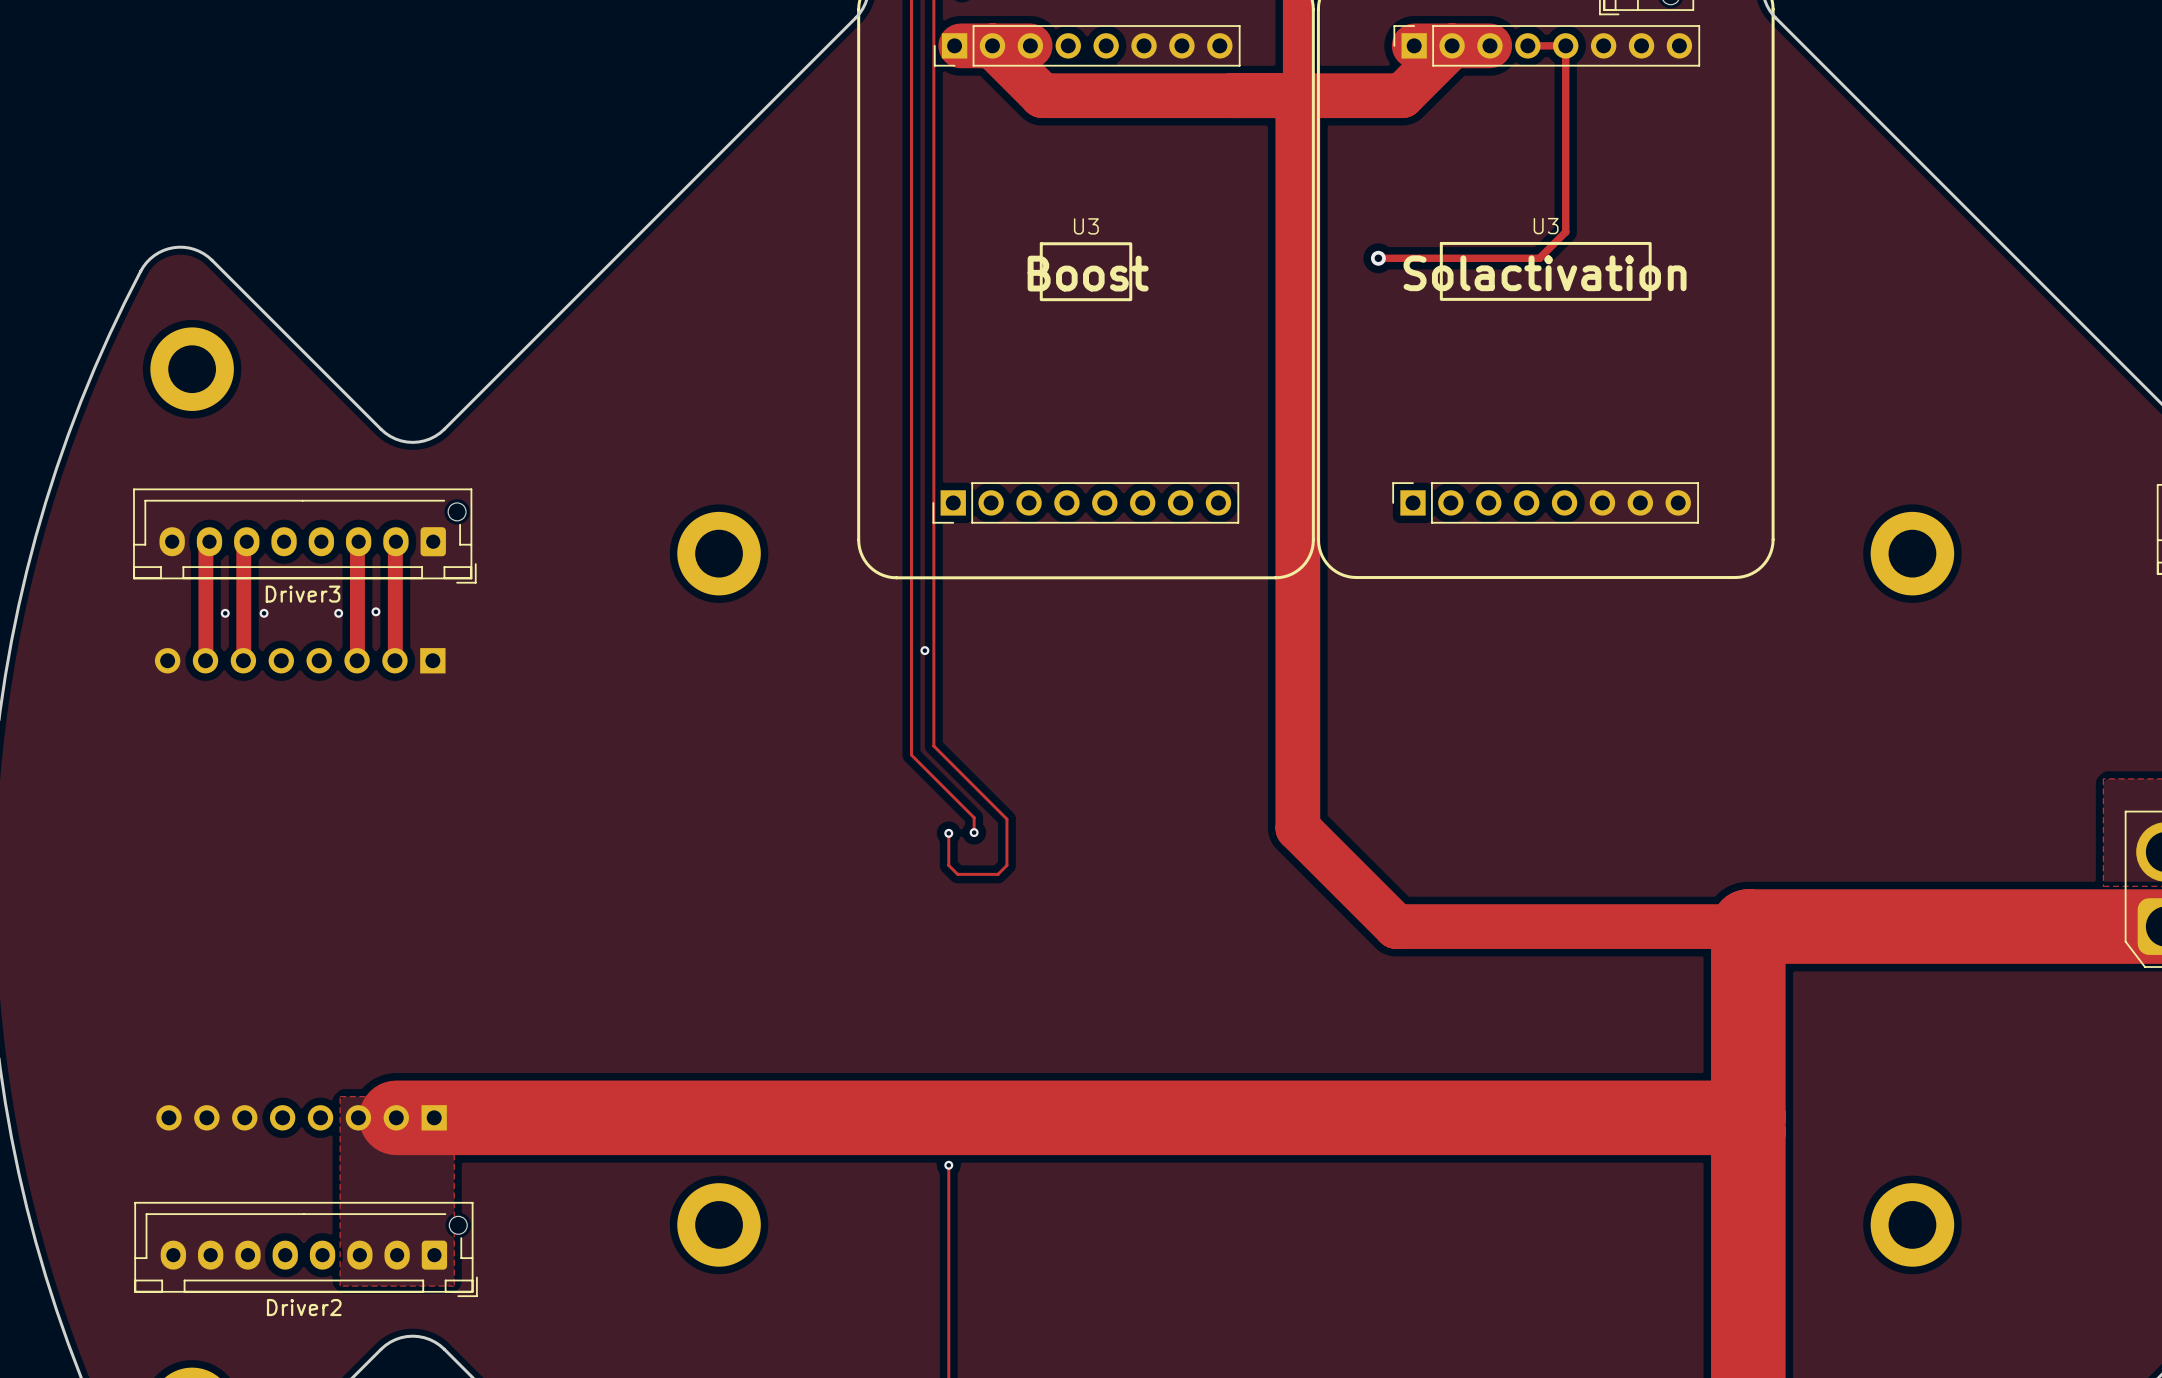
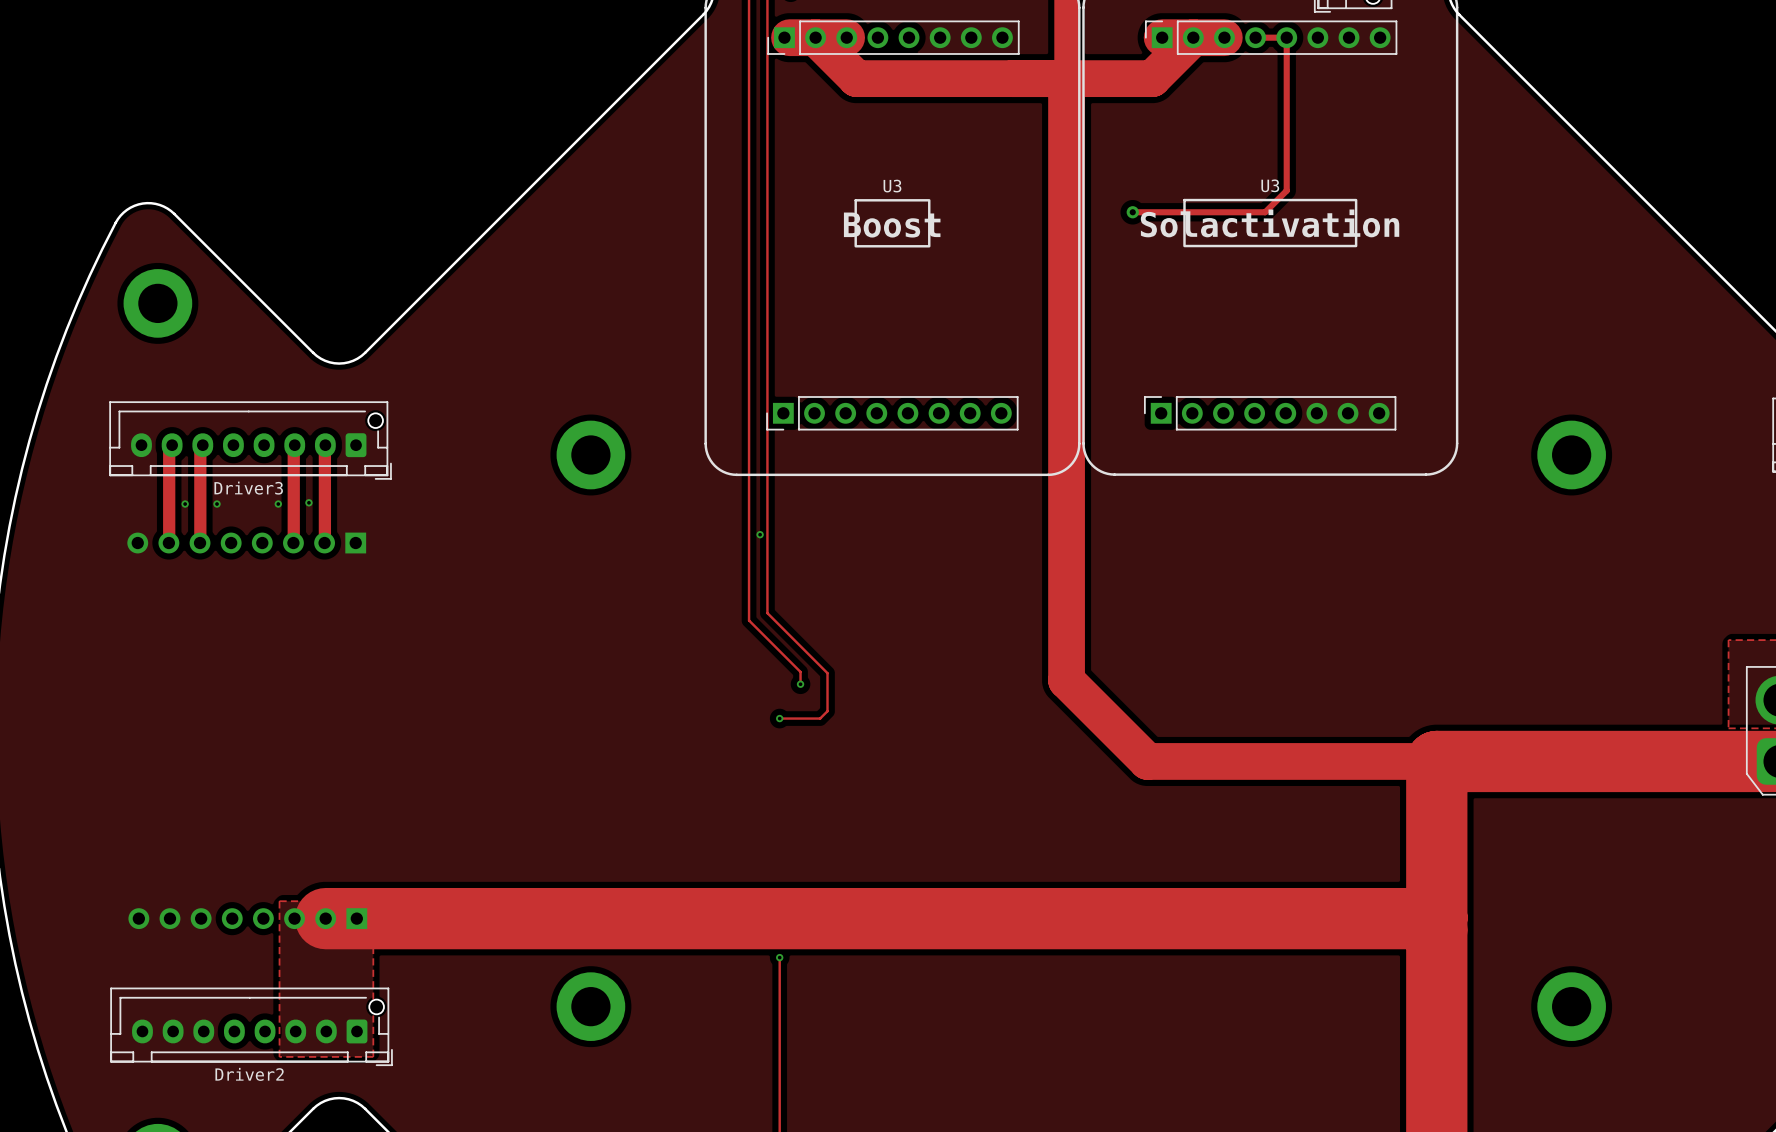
track: (948, 833) (948, 865) (957, 874) -> (779, 718) (787, 718)
via position: (948, 833) -> (779, 718)

